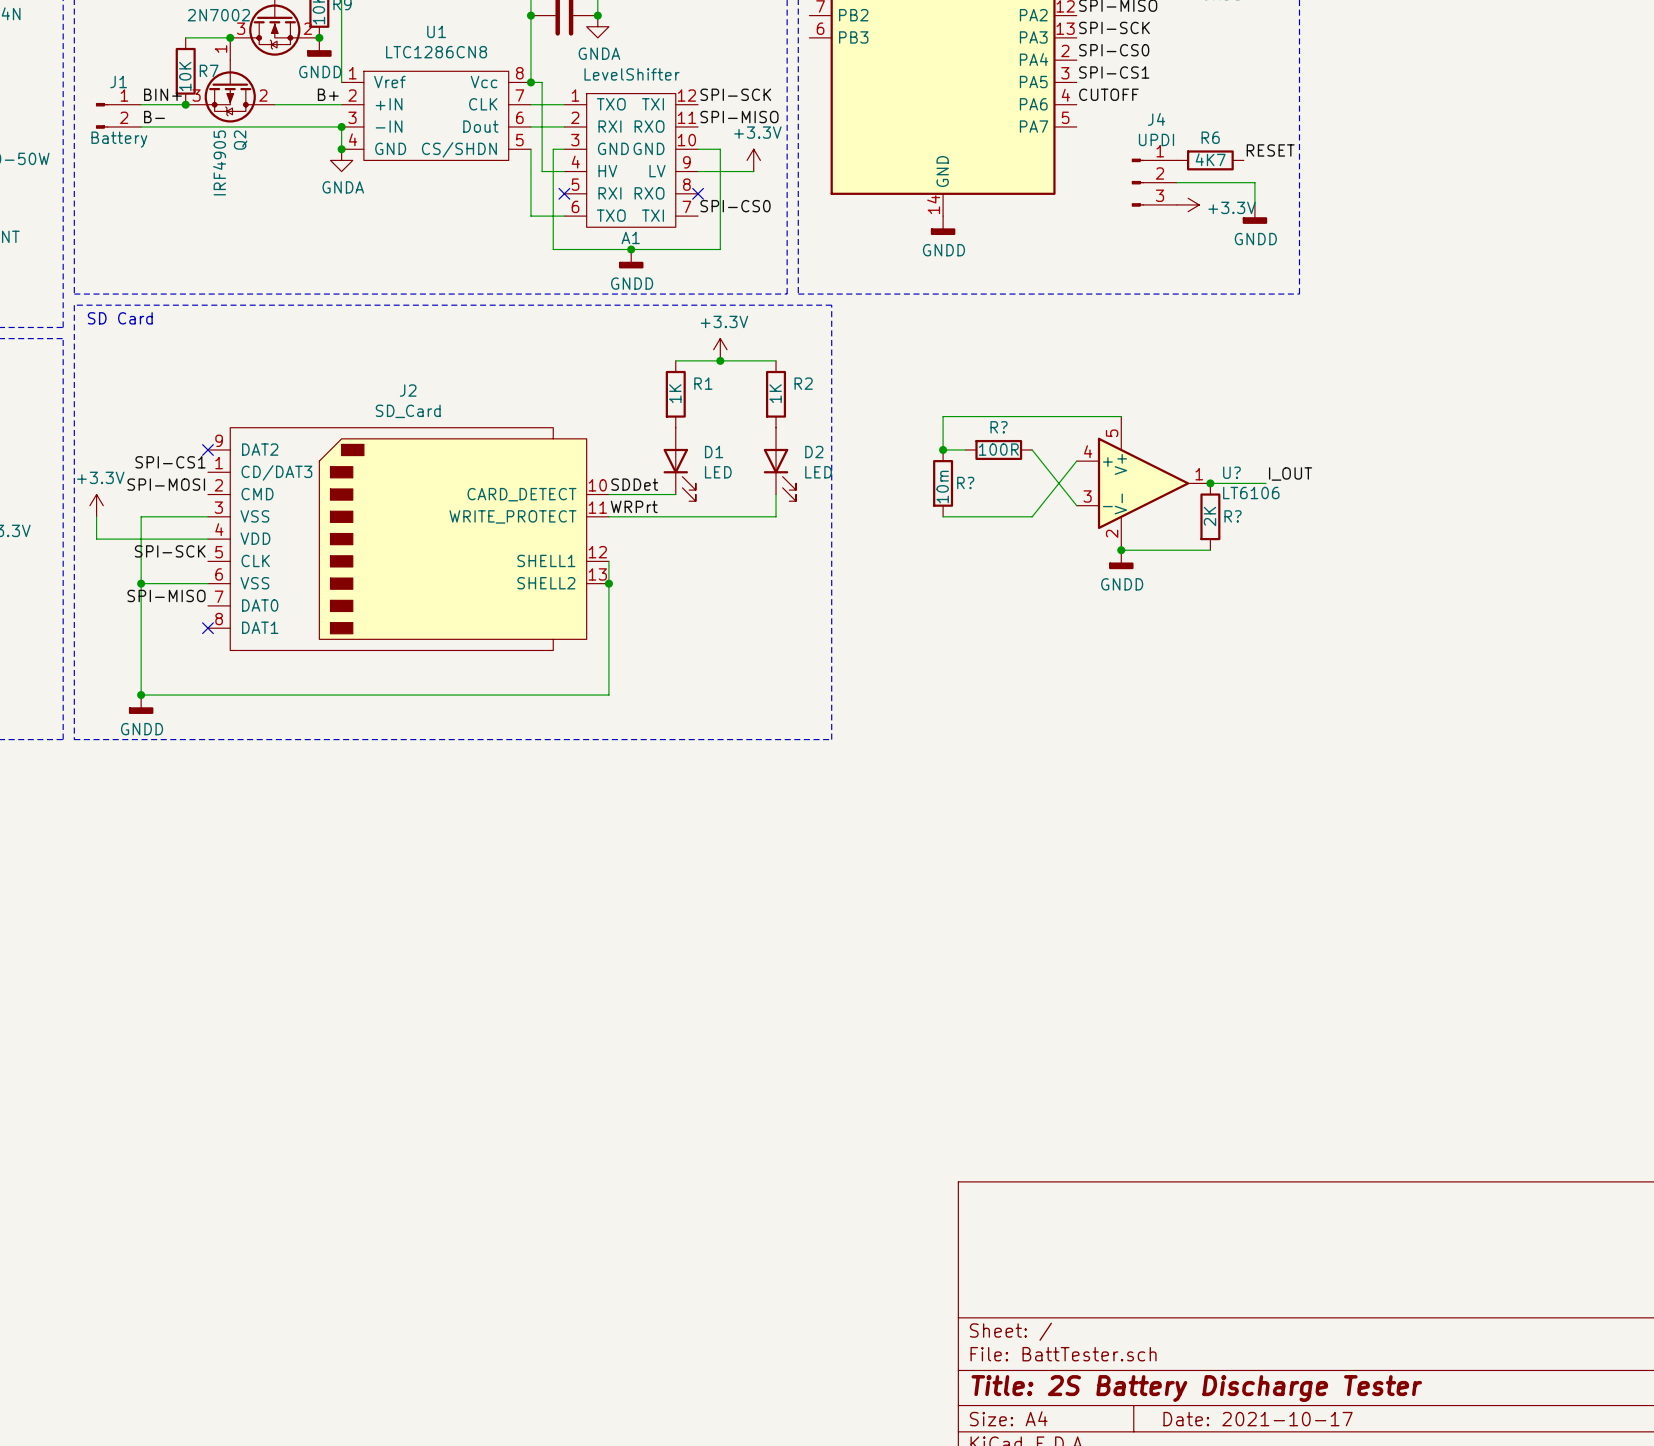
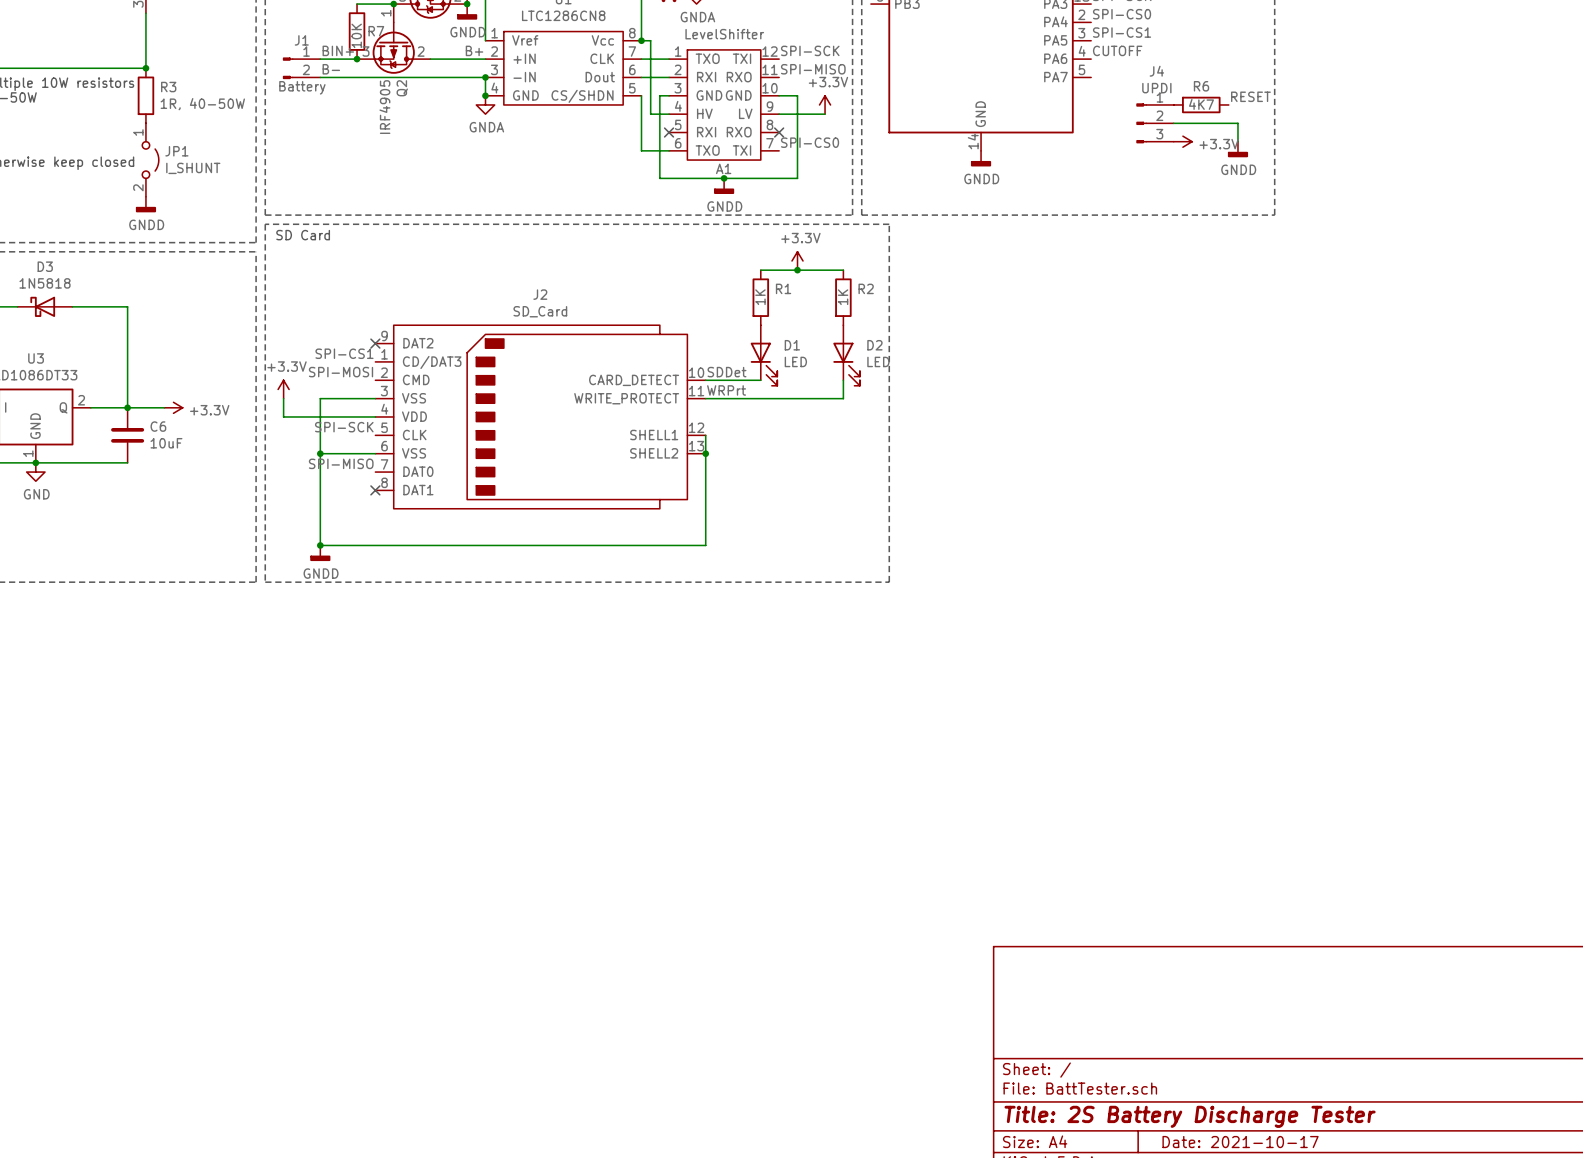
wire: (1121, 416) (943, 416) (943, 449) (965, 449) -> none
junction: (943, 449) -> none
R?: 100R (998, 449) -> none
wire: (1032, 449) (1076, 505) -> none
wire: (1076, 461) (1032, 516) (943, 516) -> none
label: I_OUT (1290, 473) -> none
R?: 10m (943, 483) -> none
U?: LT6106 (1143, 483) -> none
wire: (1210, 483) (1266, 483) -> none
junction: (1210, 483) -> none
R?: 2K (1210, 516) -> none
wire: (1121, 550) (1210, 550) -> none
junction: (1121, 550) -> none
power symbol: GNDD (1121, 559) -> none

